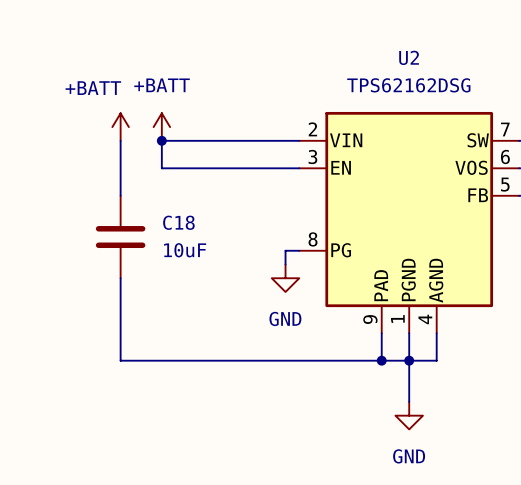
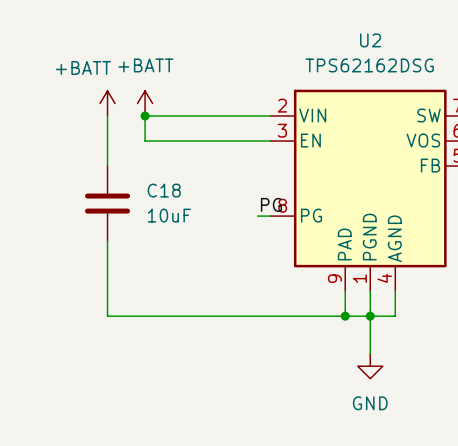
label: none -> PG (271, 204)
wire: (285, 250) (285, 264) -> none
power symbol: GND (285, 278) -> none

